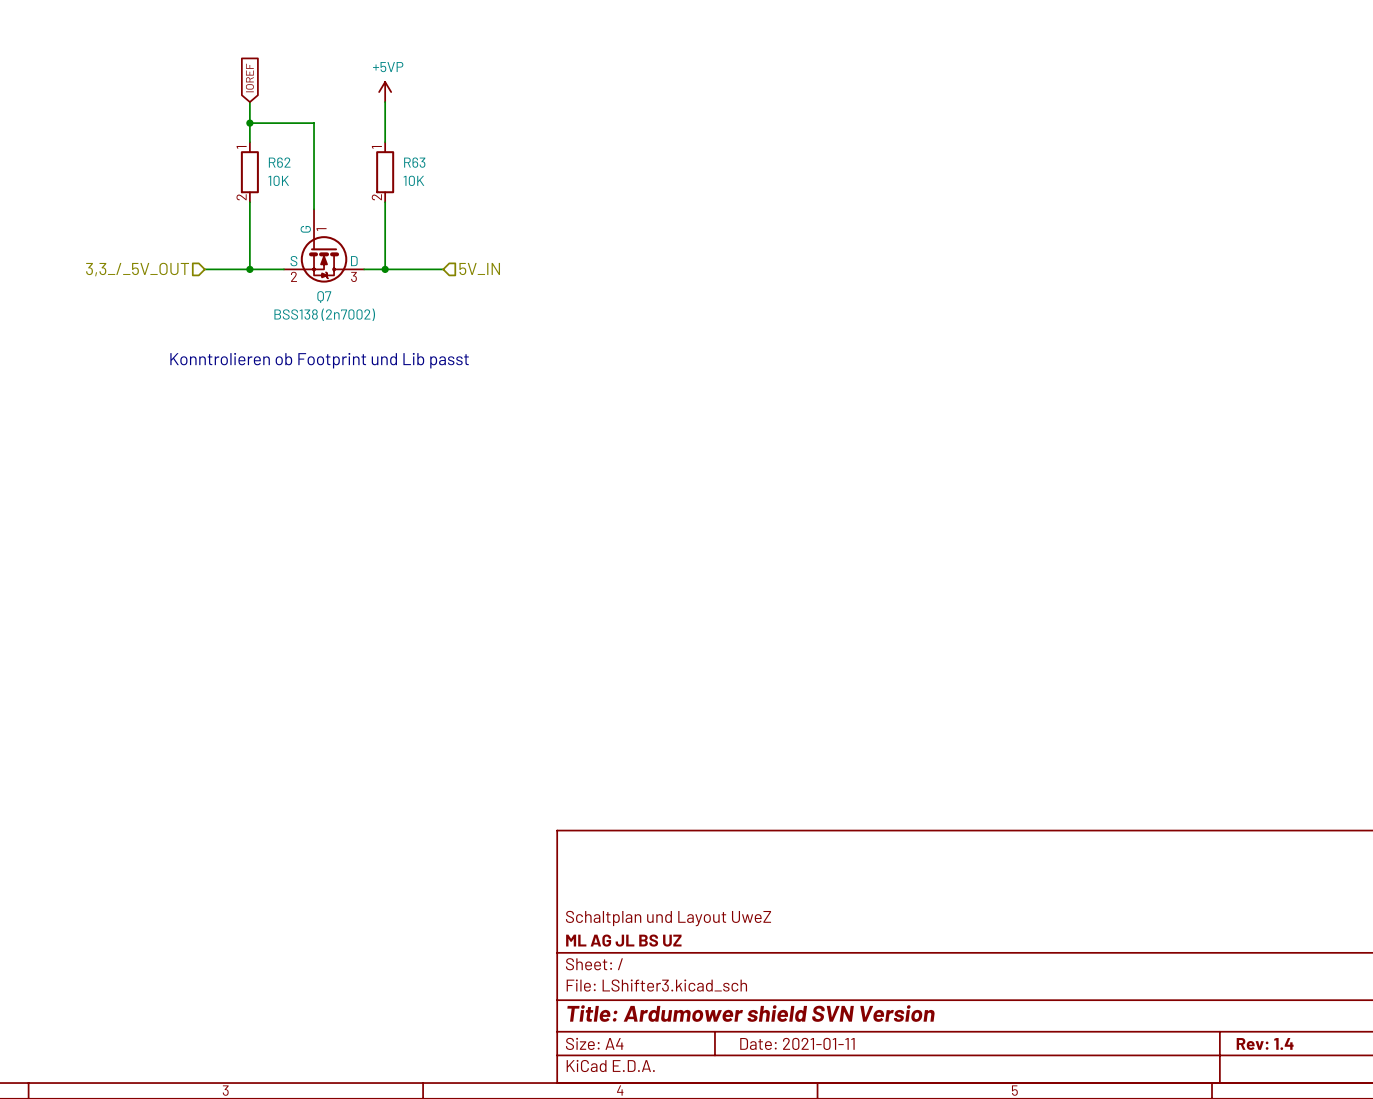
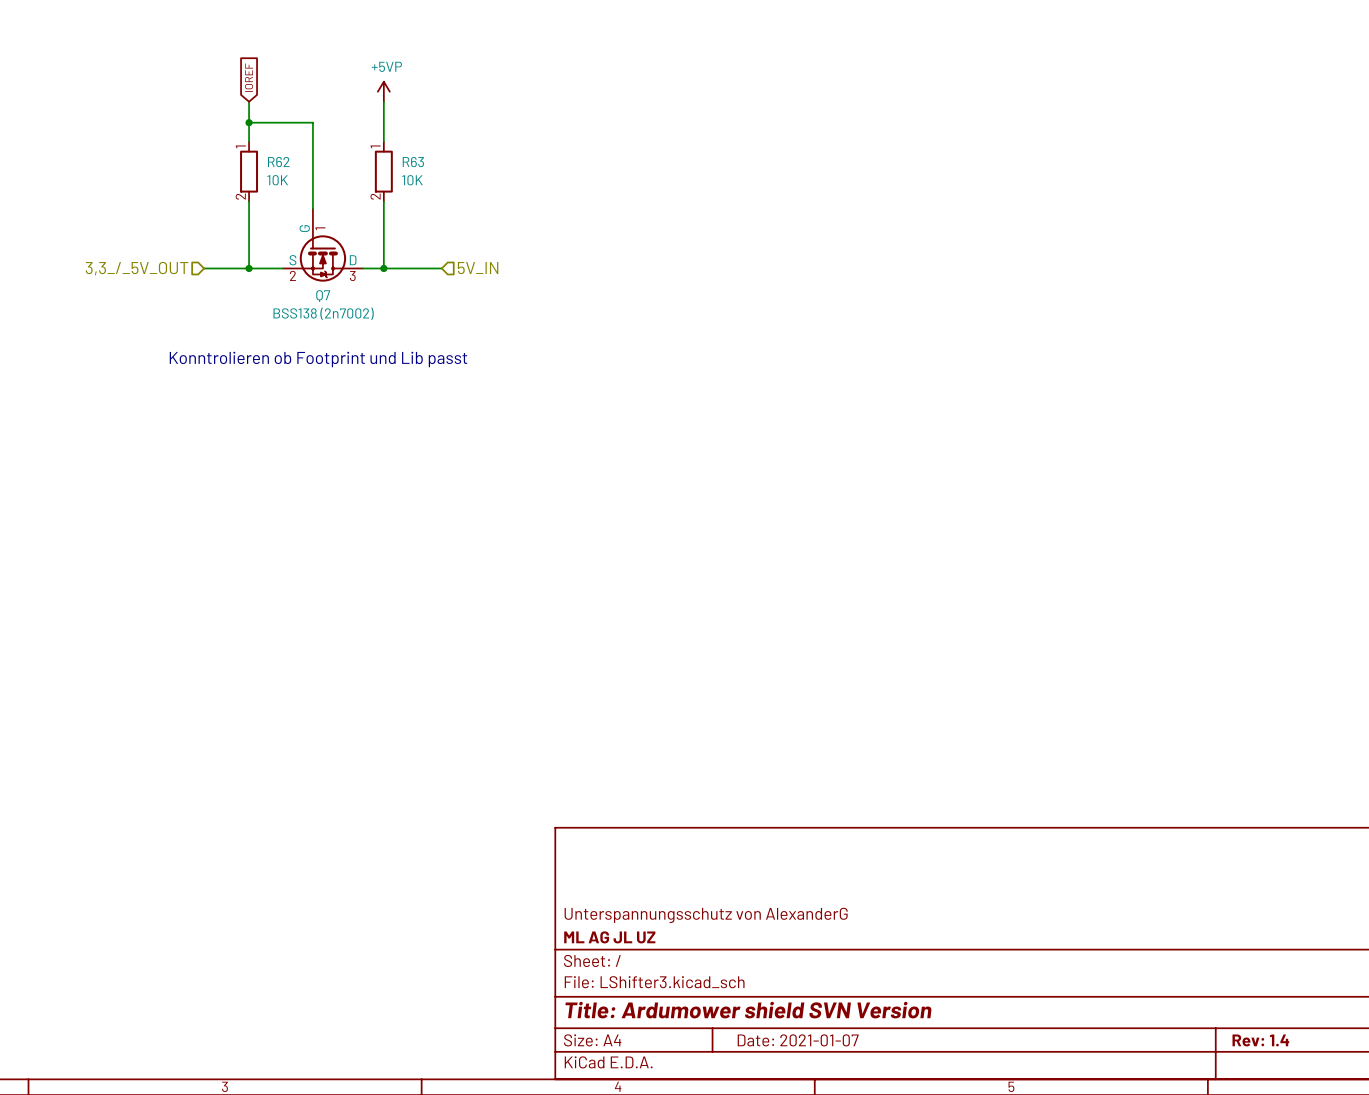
title block: Schaltplan und Layout UweZ (668, 918) -> Unterspannungsschutz von AlexanderG (706, 915)
title block: ML AG JL BS UZ (623, 940) -> ML AG JL UZ (609, 937)
title block: Date: 2021-01-11 (797, 1043) -> Date: 2021-01-07 (798, 1040)

